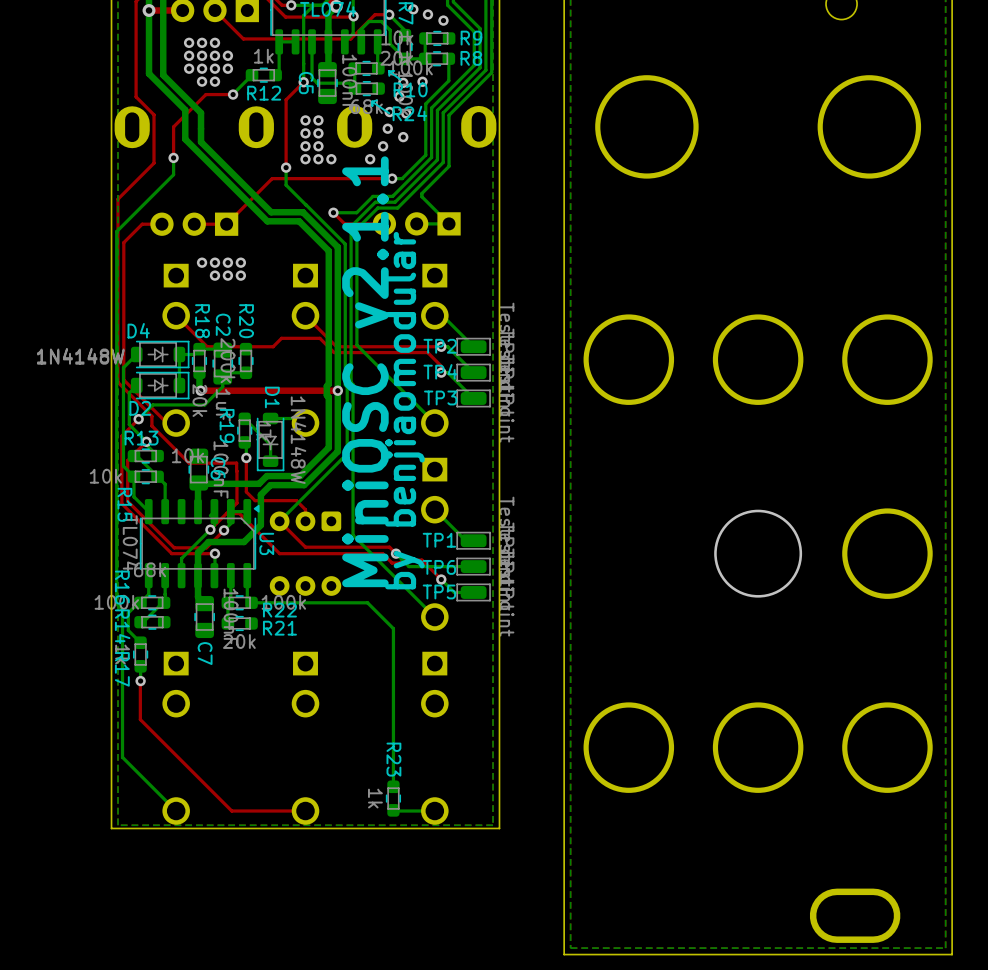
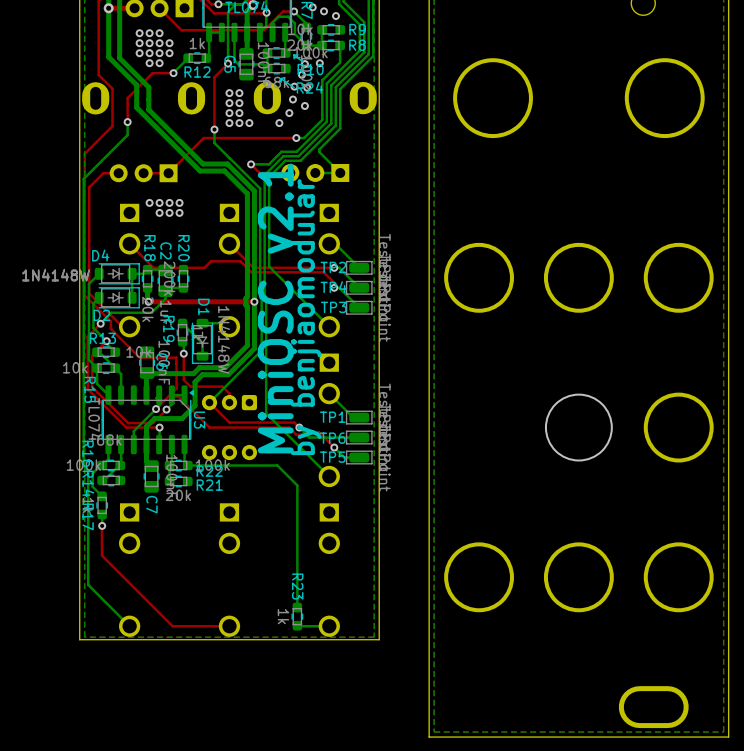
text: MiniOSC v2.1.1 (365, 371) -> MiniOSC v2.1 (275, 308)

